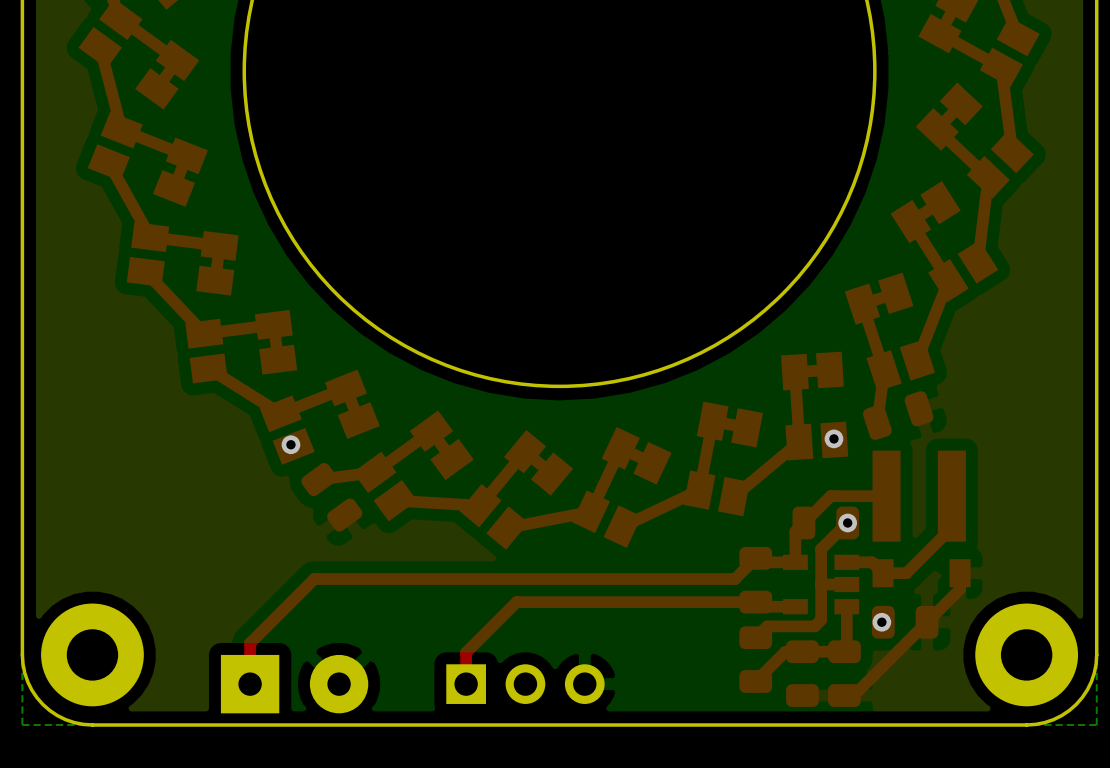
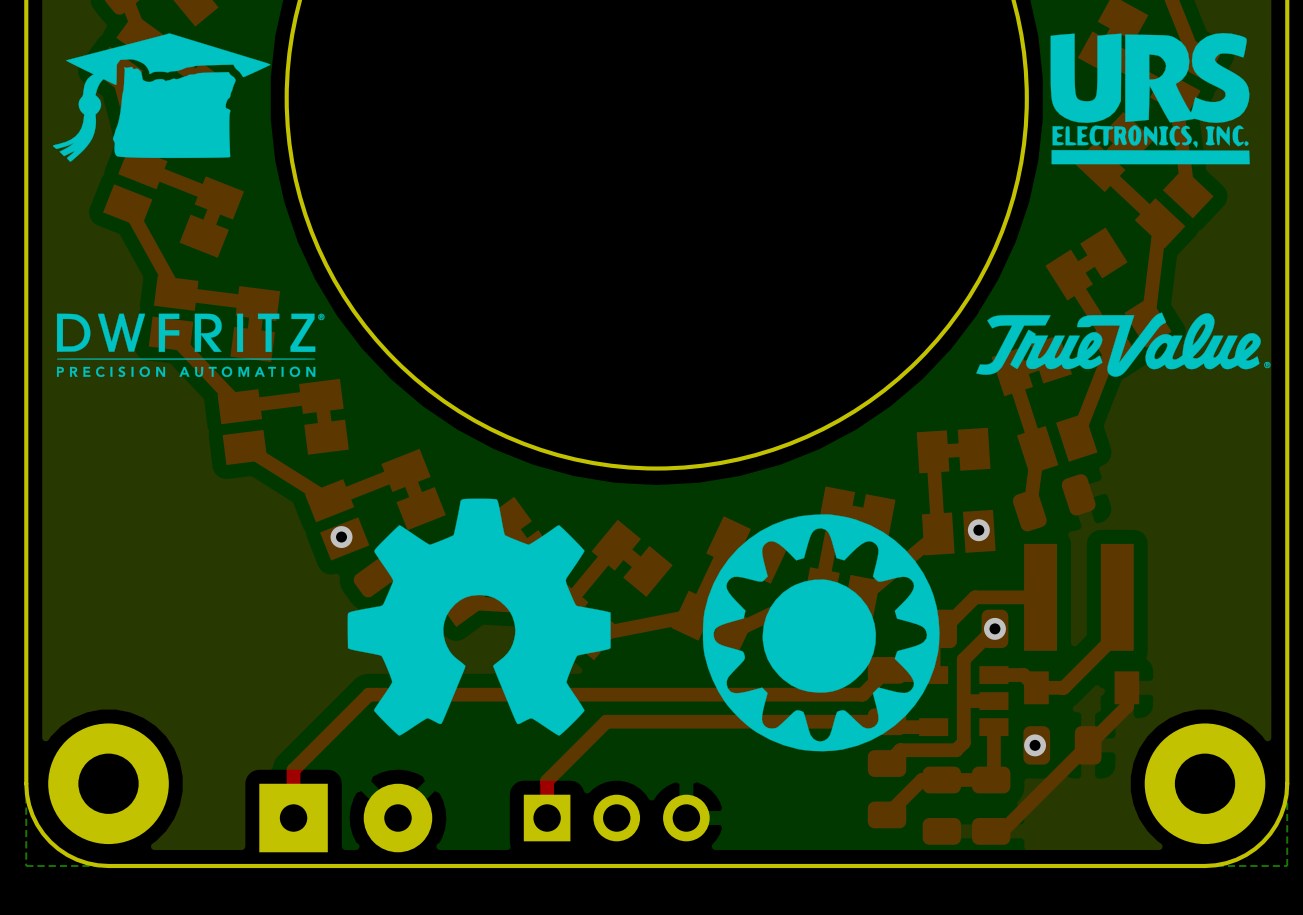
drawing: none -> [52, 33, 271, 162]
drawing: none -> [1050, 33, 1250, 165]
drawing: none -> [976, 312, 1271, 377]
drawing: none -> [56, 313, 325, 378]
drawing: none -> [347, 498, 611, 736]
drawing: none -> [702, 514, 940, 752]

